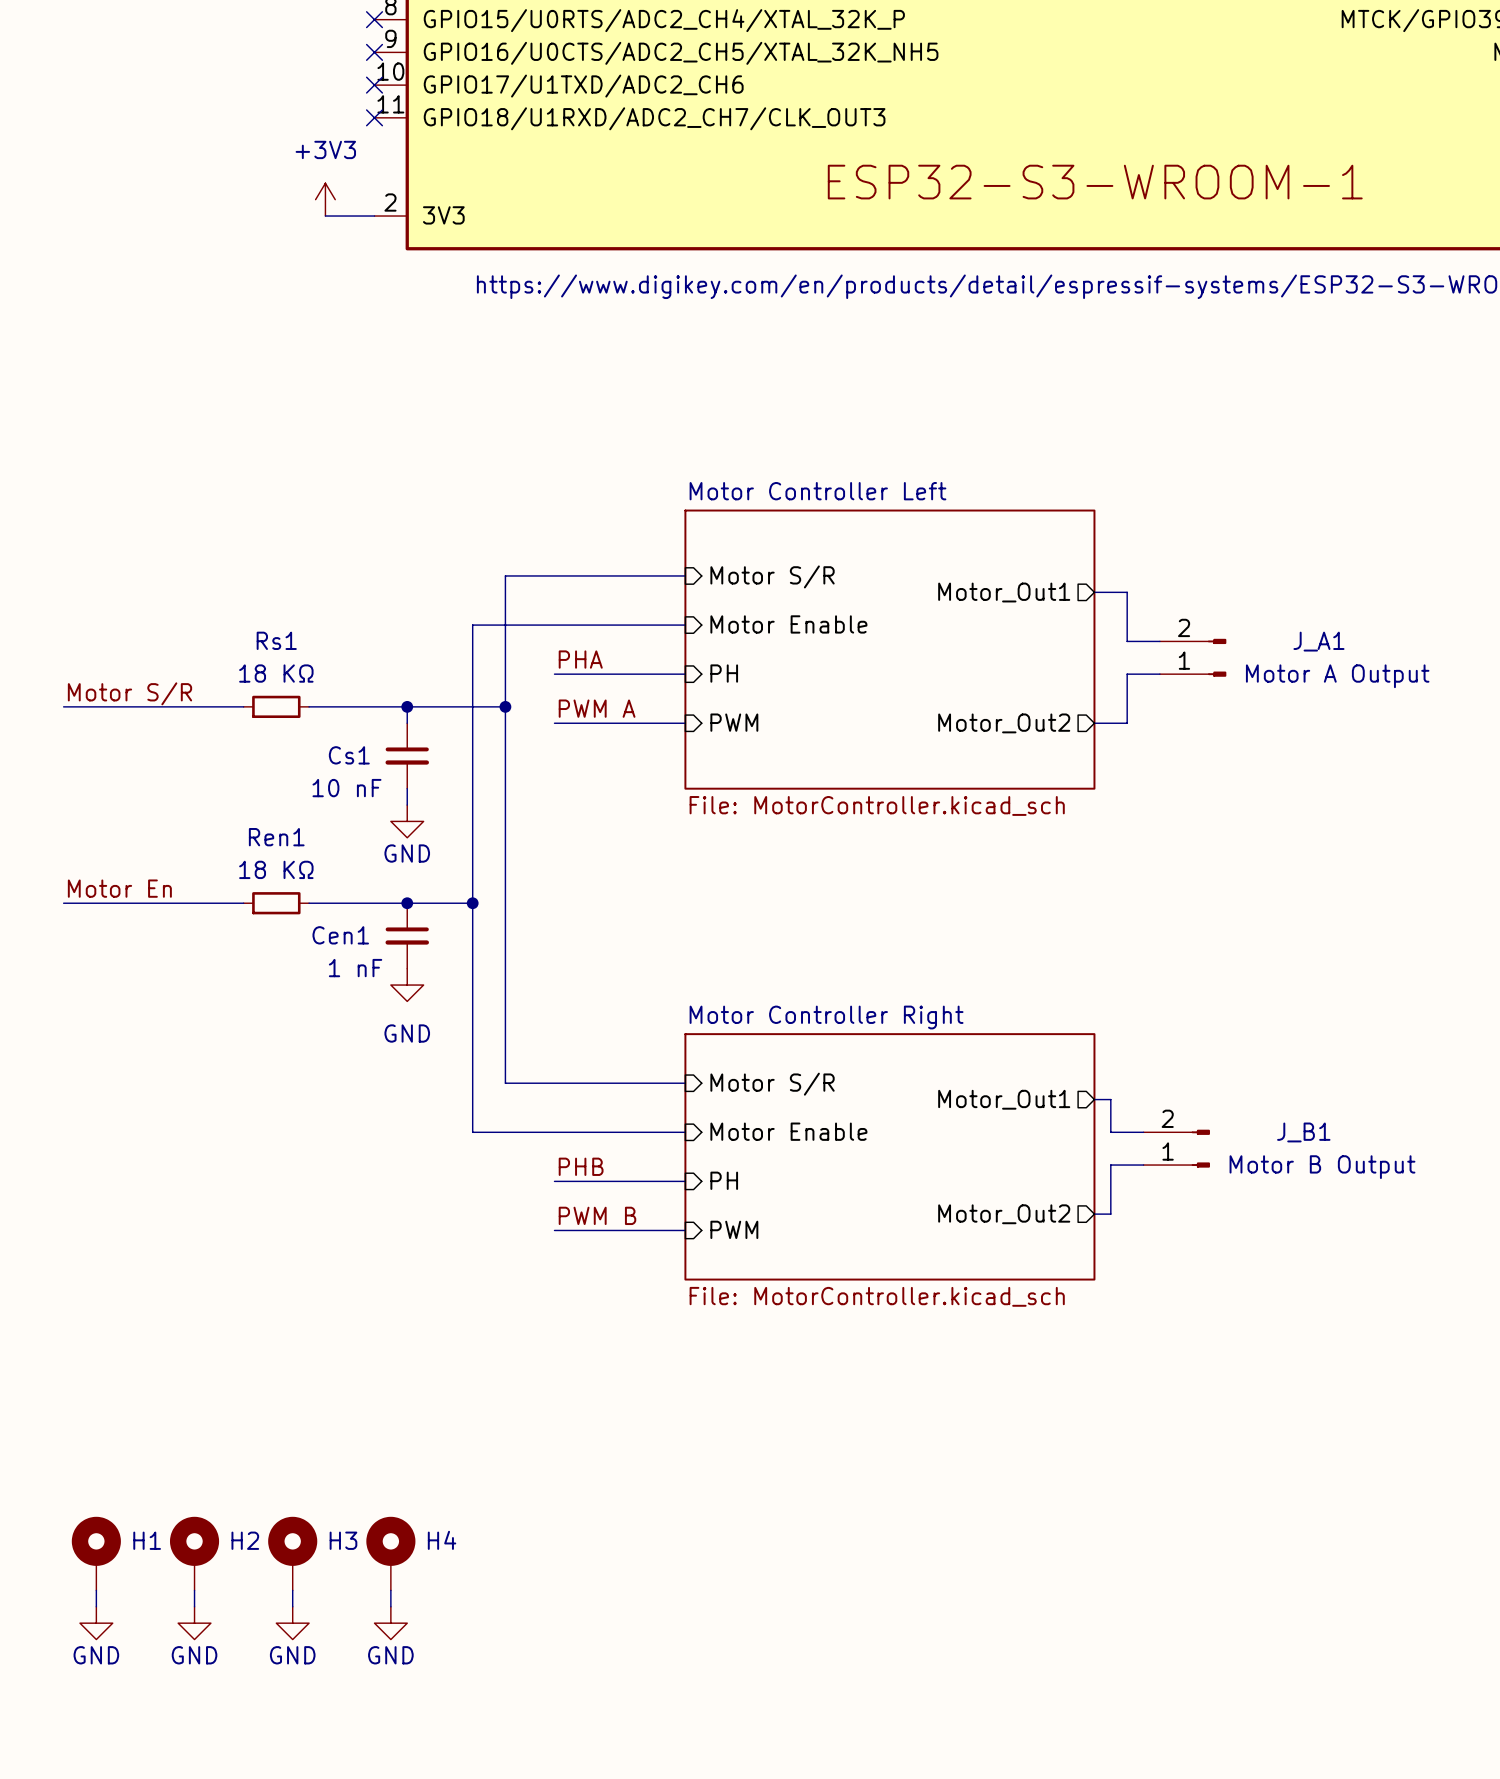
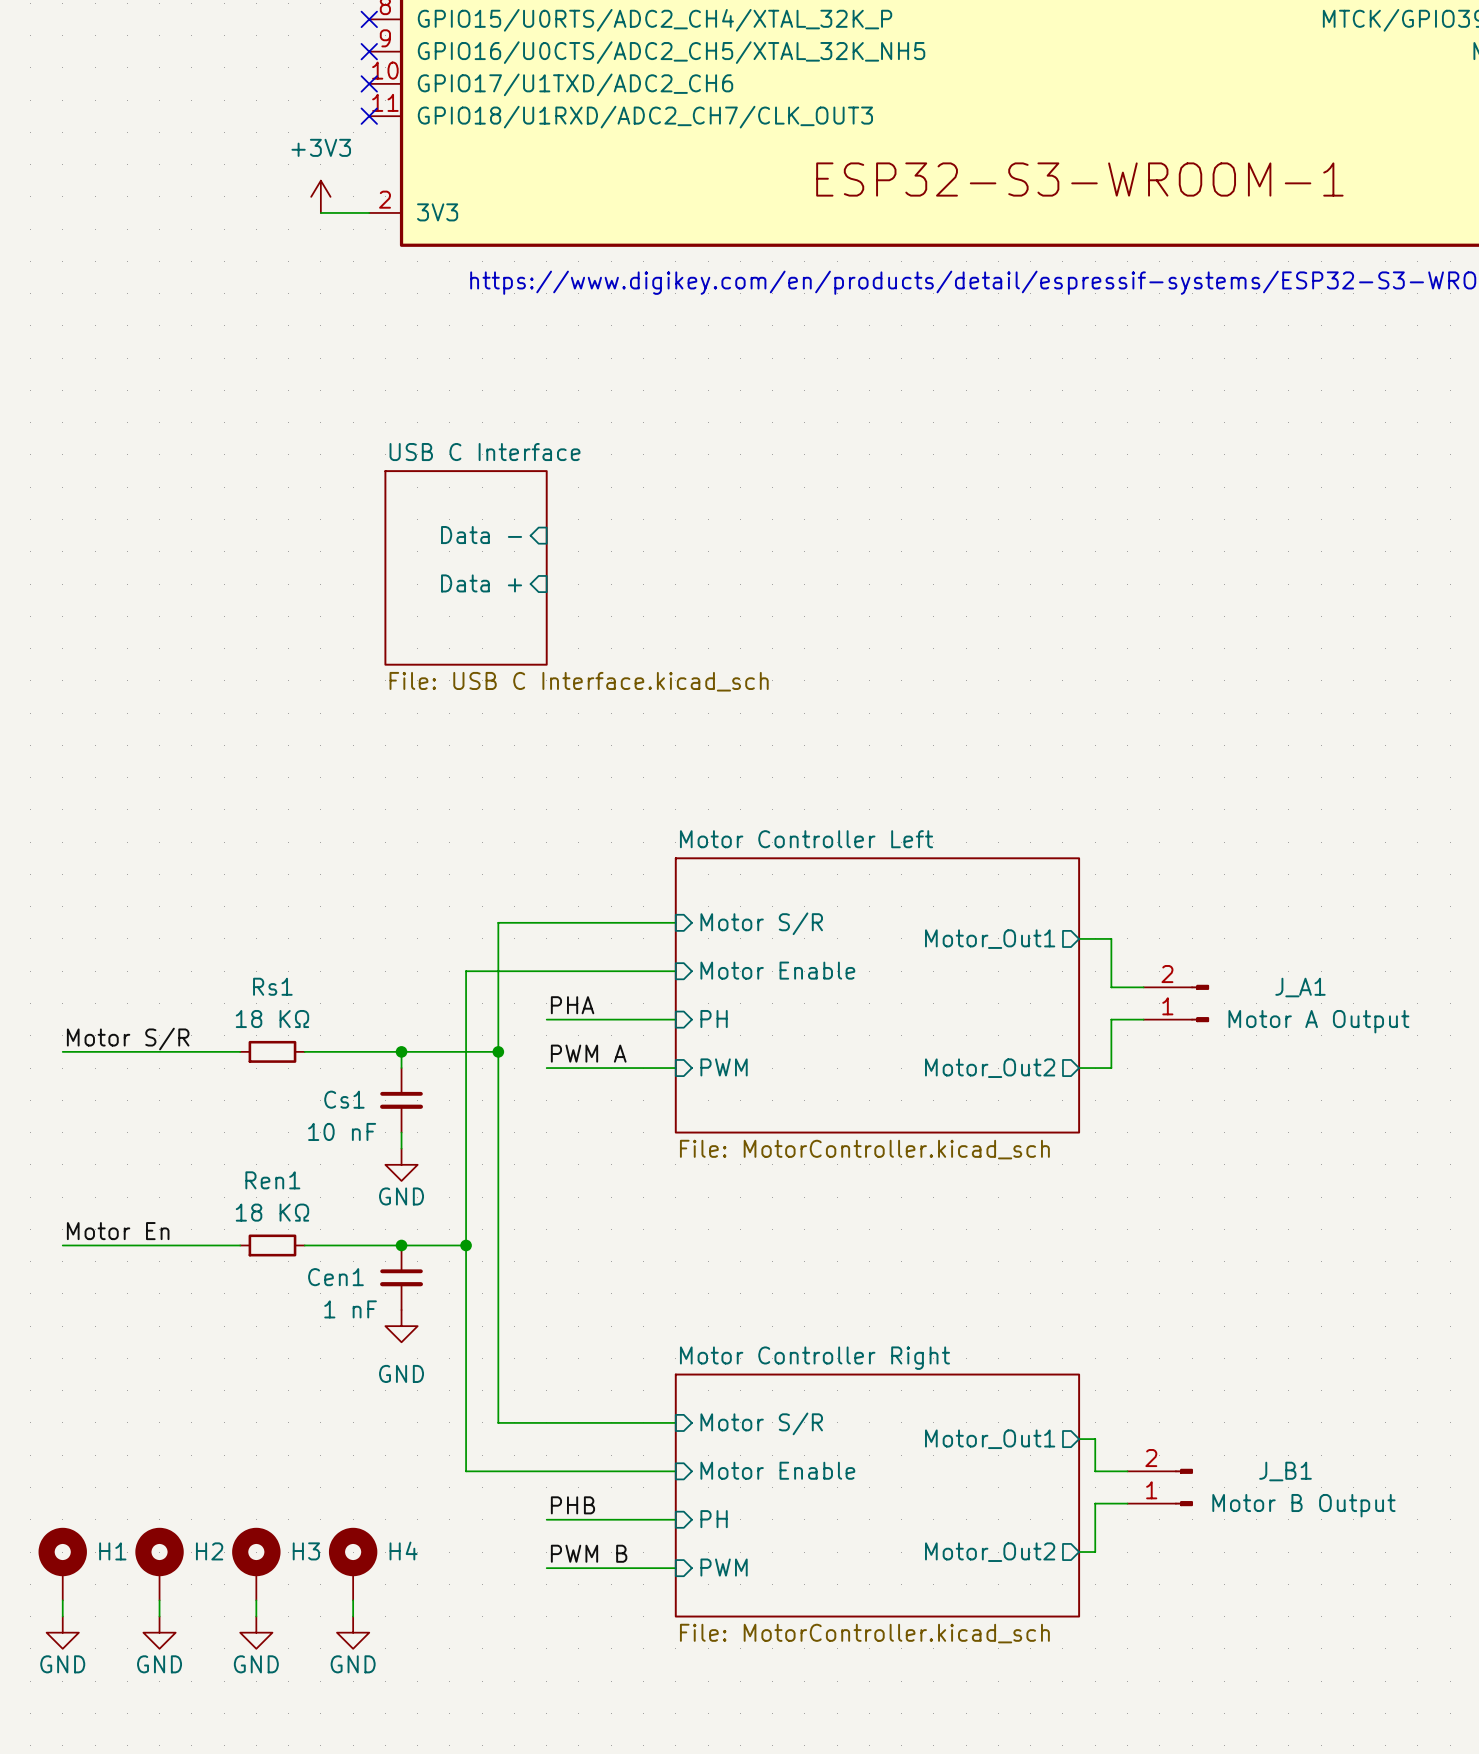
sheet pin: none -> Data - (481, 535)
sheet USB C Interface: none -> File: USB C Interface.kicad_sch (466, 567)
wire: (685, 575) (505, 575) (505, 935) -> (675, 922) (498, 922)
sheet pin: Motor S/R (772, 576) -> none
sheet pin: none -> Data + (481, 583)
sheet pin: Motor_Out1 (1004, 592) -> none
wire: (1094, 592) (1127, 592) (1127, 641) (1159, 641) -> none
sheet pin: Motor Enable (788, 624) -> none
wire: (685, 625) (472, 625) (472, 985) -> (675, 971) (466, 971)
sheet Motor Controller Left: File: MotorController.kicad_sch (889, 649) -> none
J_A1 position: (1193, 657) -> (1176, 1003)
label: PHA (580, 659) -> none
sheet pin: PH (724, 673) -> none
wire: (554, 674) (685, 674) -> none
wire: (1159, 674) (1127, 674) (1127, 723) (1094, 723) -> none
label: Motor S/R (129, 693) -> none
wire: (63, 706) (243, 706) -> none
Rs1 position: (276, 706) -> (272, 1051)
wire: (309, 706) (505, 706) -> none
wire: (407, 706) (407, 723) -> none
junction: (407, 706) -> none
junction: (505, 706) -> none
label: PWM A (597, 708) -> none
sheet pin: PWM (734, 722) -> none
wire: (554, 723) (685, 723) -> none
sheet pin: Motor_Out2 (1004, 723) -> none
Cs1 position: (407, 755) -> (401, 1100)
wire: (407, 788) (407, 805) -> (401, 1051) (401, 1068)
power symbol: GND (407, 821) -> none
label: Motor En (119, 888) -> none
wire: (63, 903) (243, 903) -> (62, 1051) (240, 1051)
Ren1 position: (276, 903) -> (272, 1245)
wire: (309, 903) (472, 903) -> none
junction: (407, 903) -> none
junction: (472, 903) -> none
Cen1 position: (407, 935) -> (401, 1277)
sheet pin: none -> Motor S/R (761, 923)
wire: none -> (1079, 938) (1111, 938) (1111, 987) (1143, 987)
power symbol: GND (407, 985) -> none
sheet Motor Controller Left: none -> File: MotorController.kicad_sch (877, 995)
label: none -> PHA (572, 1005)
wire: none -> (1143, 1019) (1111, 1019) (1111, 1068) (1079, 1068)
label: none -> Motor S/R (128, 1039)
wire: none -> (304, 1051) (498, 1051)
junction: none -> (401, 1051)
junction: none -> (498, 1051)
label: none -> PWM A (588, 1053)
wire: (505, 1083) (554, 1083) -> (498, 1068) (498, 1422) (675, 1422)
sheet pin: Motor S/R (772, 1084) -> PWM (724, 1067)
sheet pin position: Motor_Out1 (1004, 1099) -> Motor_Out1 (990, 939)
wire: (1094, 1099) (1110, 1099) (1110, 1132) (1143, 1132) -> none
sheet pin position: Motor Enable (788, 1131) -> Motor Enable (777, 970)
wire: (472, 1132) (685, 1132) -> (466, 1116) (466, 1471) (675, 1471)
wire: none -> (401, 1132) (401, 1148)
J_B1 position: (1176, 1148) -> (1160, 1487)
sheet Motor Controller Right: File: MotorController.kicad_sch (889, 1156) -> none
wire: (1143, 1165) (1110, 1165) (1110, 1214) (1094, 1214) -> none
label: PHB (581, 1166) -> none
sheet pin position: PH (724, 1180) -> PH (714, 1019)
power symbol: none -> GND (401, 1164)
wire: (554, 1181) (685, 1181) -> (546, 1019) (675, 1019)
sheet pin position: Motor_Out2 (1004, 1214) -> Motor_Out2 (990, 1068)
label: PWM B (597, 1215) -> none
sheet pin: PWM (734, 1229) -> none
wire: (554, 1230) (685, 1230) -> (546, 1519) (675, 1519)
label: none -> Motor En (118, 1231)
wire: none -> (62, 1245) (240, 1245)
wire: none -> (304, 1245) (466, 1245)
junction: none -> (401, 1245)
junction: none -> (466, 1245)
power symbol: none -> GND (401, 1326)
sheet pin: none -> Motor S/R (761, 1423)
sheet pin: none -> Motor_Out1 (990, 1439)
wire: none -> (1079, 1439) (1095, 1439) (1095, 1471) (1127, 1471)
sheet pin: none -> Motor Enable (777, 1470)
sheet Motor Controller Right: none -> File: MotorController.kicad_sch (877, 1495)
wire: none -> (1127, 1503) (1095, 1503) (1095, 1552) (1079, 1552)
label: none -> PHB (572, 1505)
sheet pin: none -> PH (714, 1519)
H1 position: (96, 1553) -> (62, 1564)
H2 position: (194, 1553) -> (159, 1564)
H3 position: (292, 1553) -> (256, 1564)
H4 position: (390, 1553) -> (353, 1564)
sheet pin: none -> Motor_Out2 (990, 1552)
label: none -> PWM B (589, 1553)
sheet pin: none -> PWM (724, 1567)
wire: (96, 1590) (96, 1606) -> (62, 1600) (62, 1616)
wire: (194, 1590) (194, 1606) -> (159, 1600) (159, 1616)
wire: (292, 1590) (292, 1606) -> (256, 1600) (256, 1616)
wire: (390, 1590) (390, 1606) -> (353, 1600) (353, 1616)
wire: none -> (546, 1568) (675, 1568)
power symbol: GND (96, 1623) -> none
power symbol: GND (194, 1623) -> none
power symbol: GND (292, 1623) -> none
power symbol: GND (390, 1623) -> none
power symbol: none -> GND (62, 1632)
power symbol: none -> GND (159, 1632)
power symbol: none -> GND (256, 1632)
power symbol: none -> GND (353, 1632)

